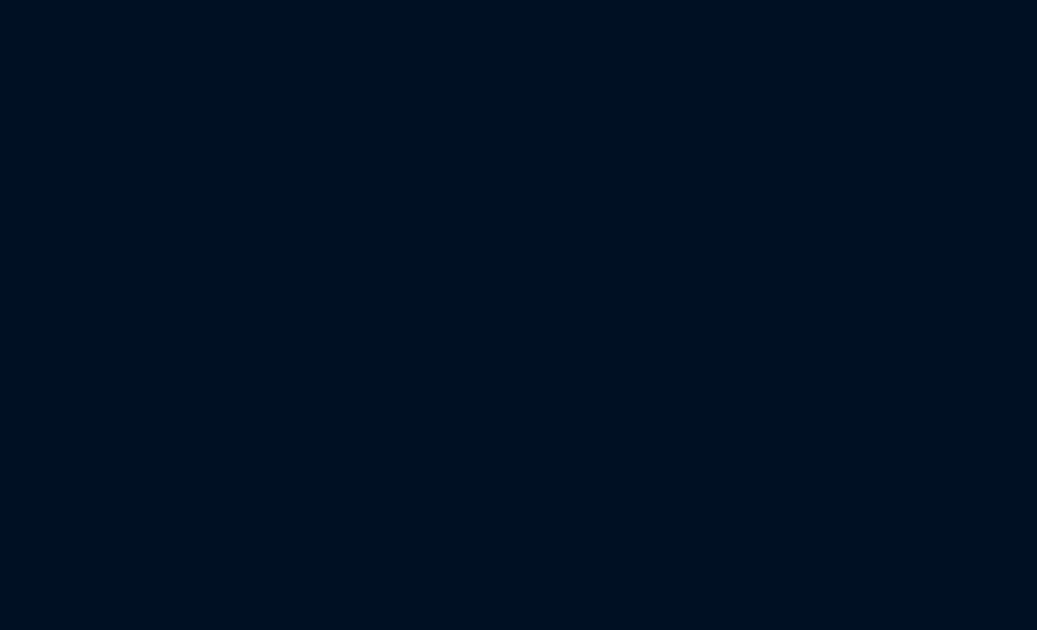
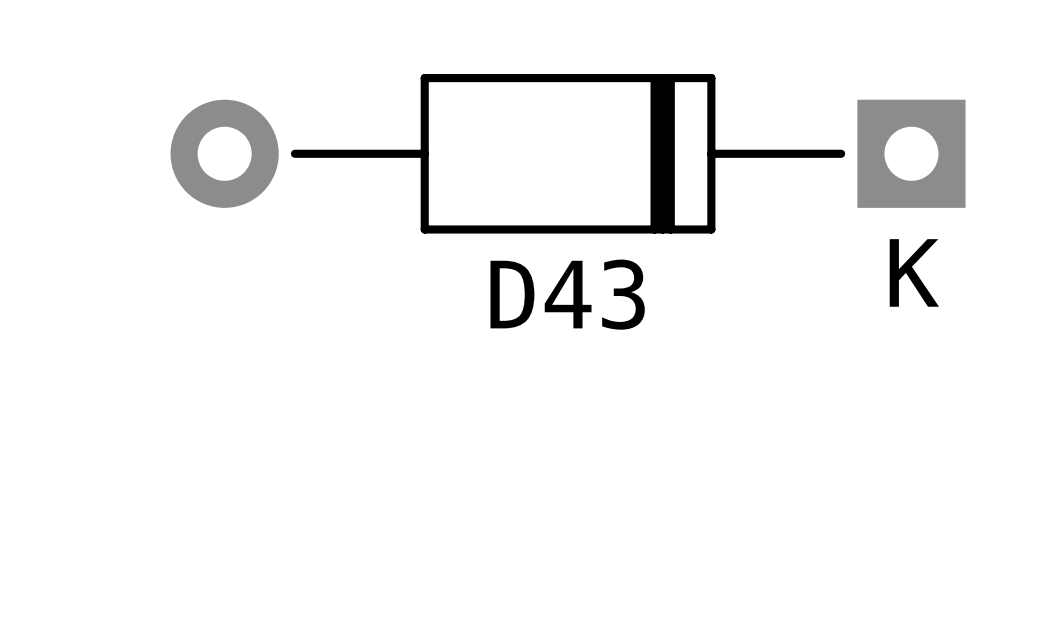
D43: none -> (568, 153)

